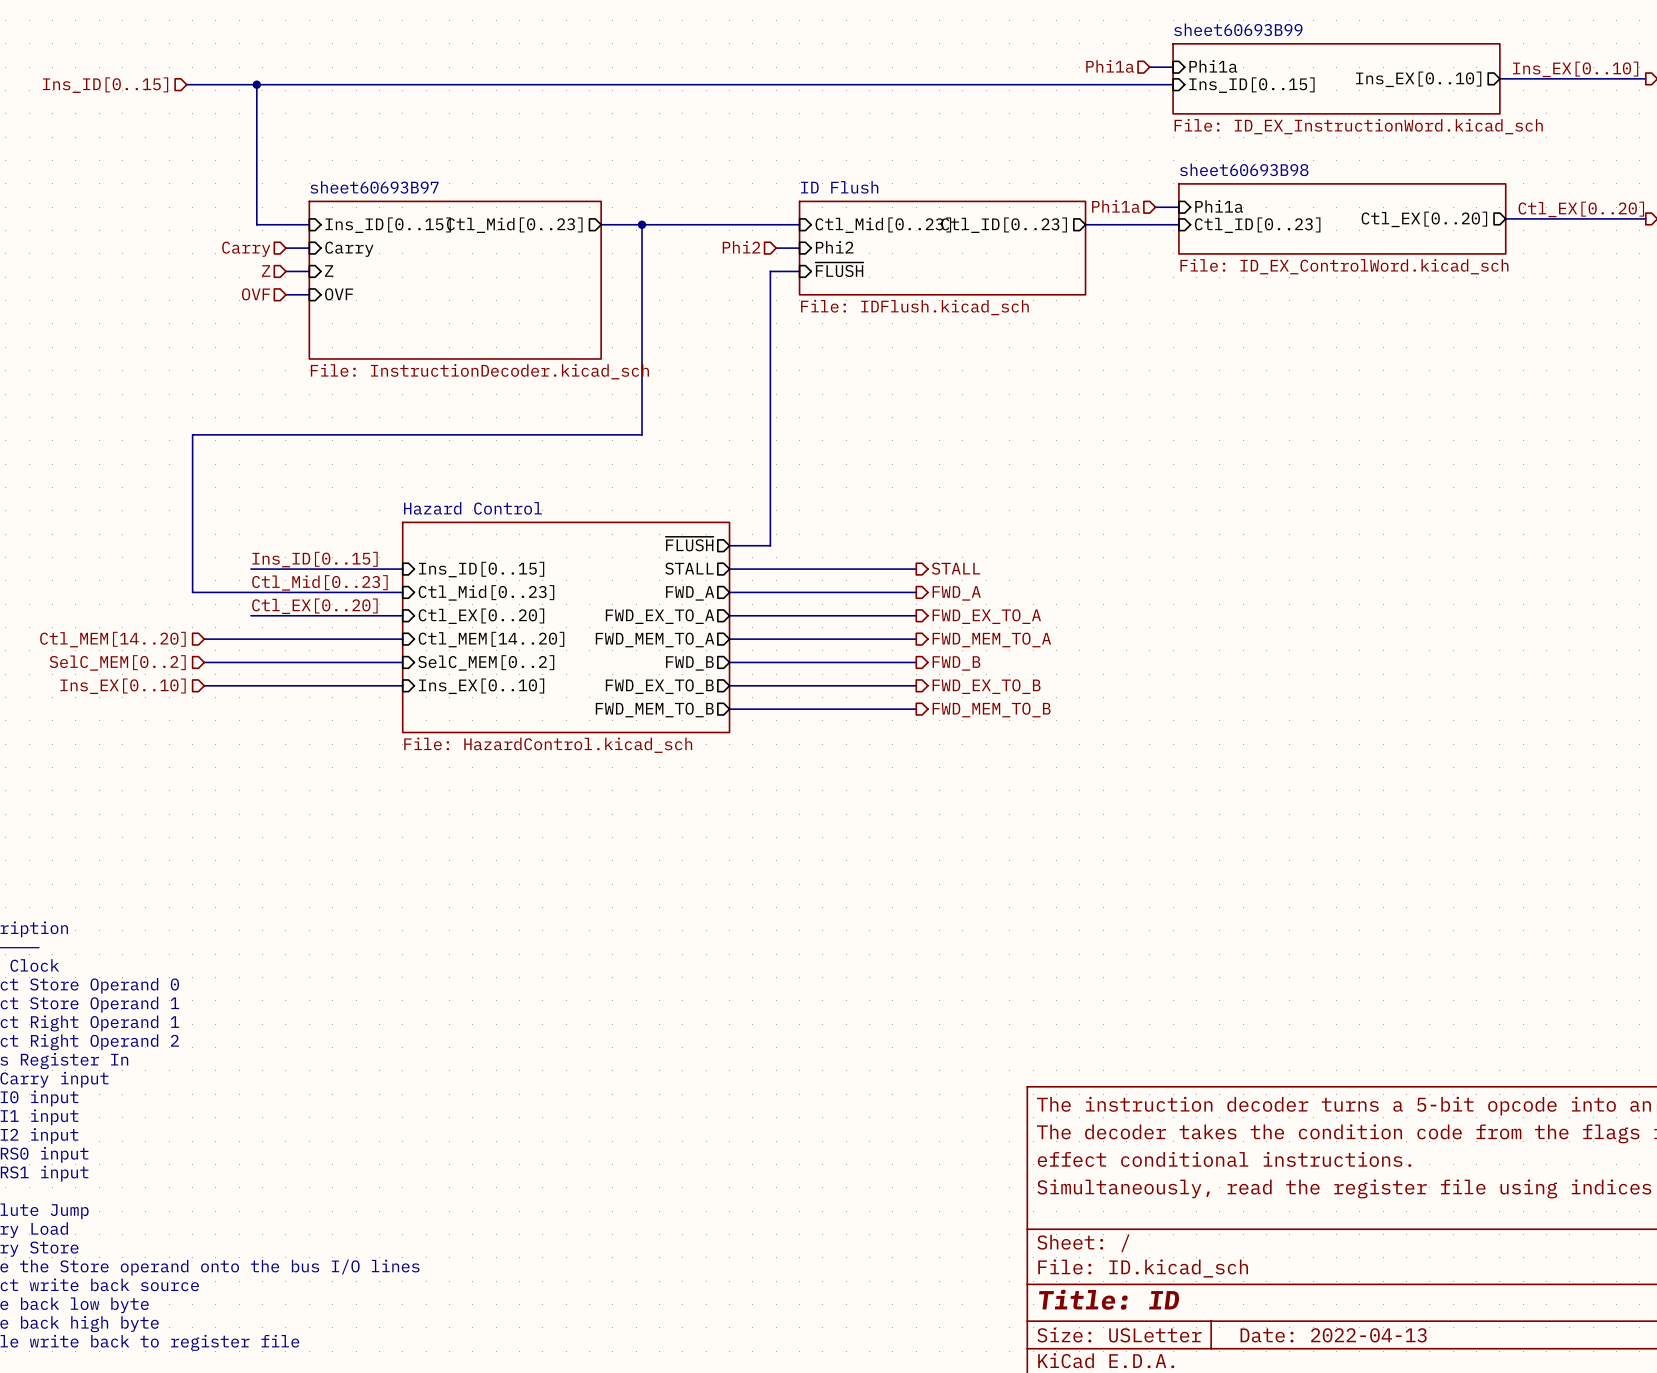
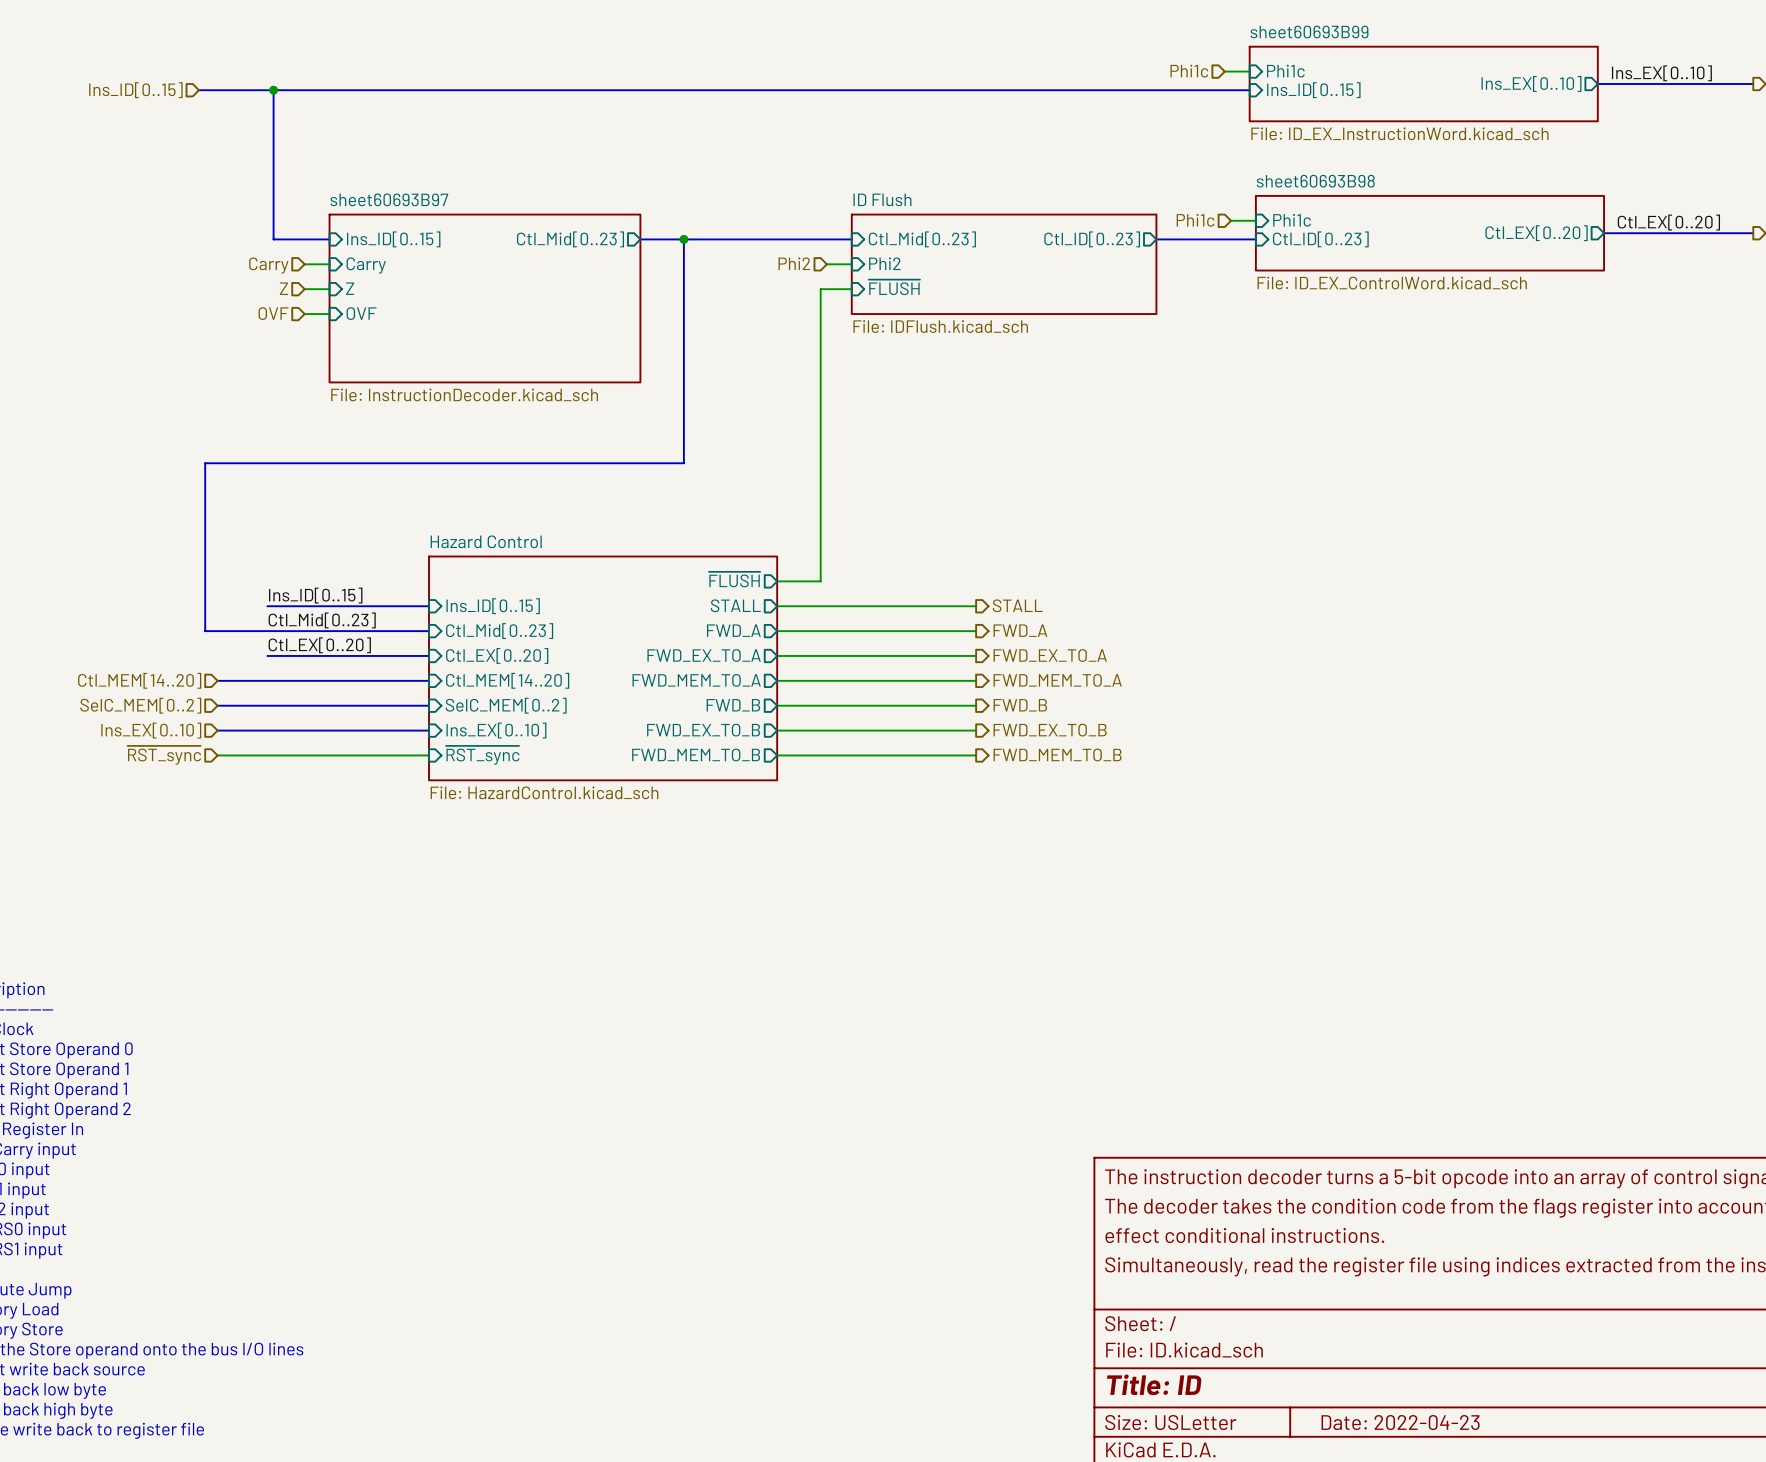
hierarchical label: Phi1a (1110, 66) -> Phi1c (1189, 71)
sheet pin: Phi1a (1213, 66) -> Phi1c (1285, 71)
hierarchical label: Phi1a (1115, 206) -> Phi1c (1195, 220)
sheet pin: Phi1a (1219, 206) -> Phi1c (1292, 220)
hierarchical label: none -> ~{RST_sync} (164, 755)
wire: none -> (217, 755) (429, 755)
sheet pin: none -> ~{RST_sync} (482, 755)
title block: Date: 2022-04-13 (1333, 1335) -> Date: 2022-04-23 (1400, 1422)

